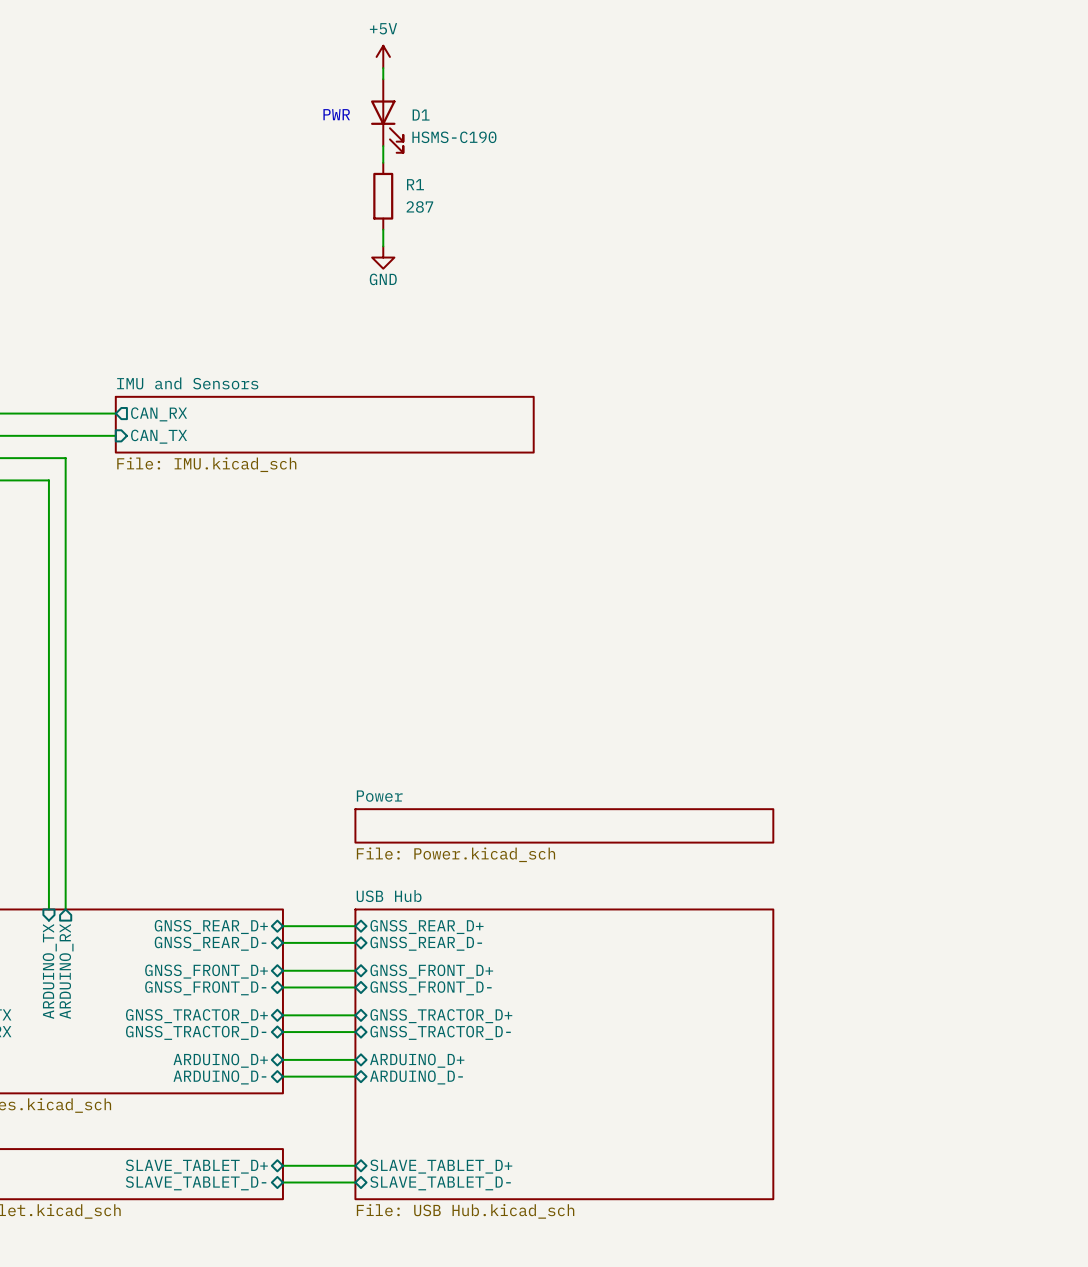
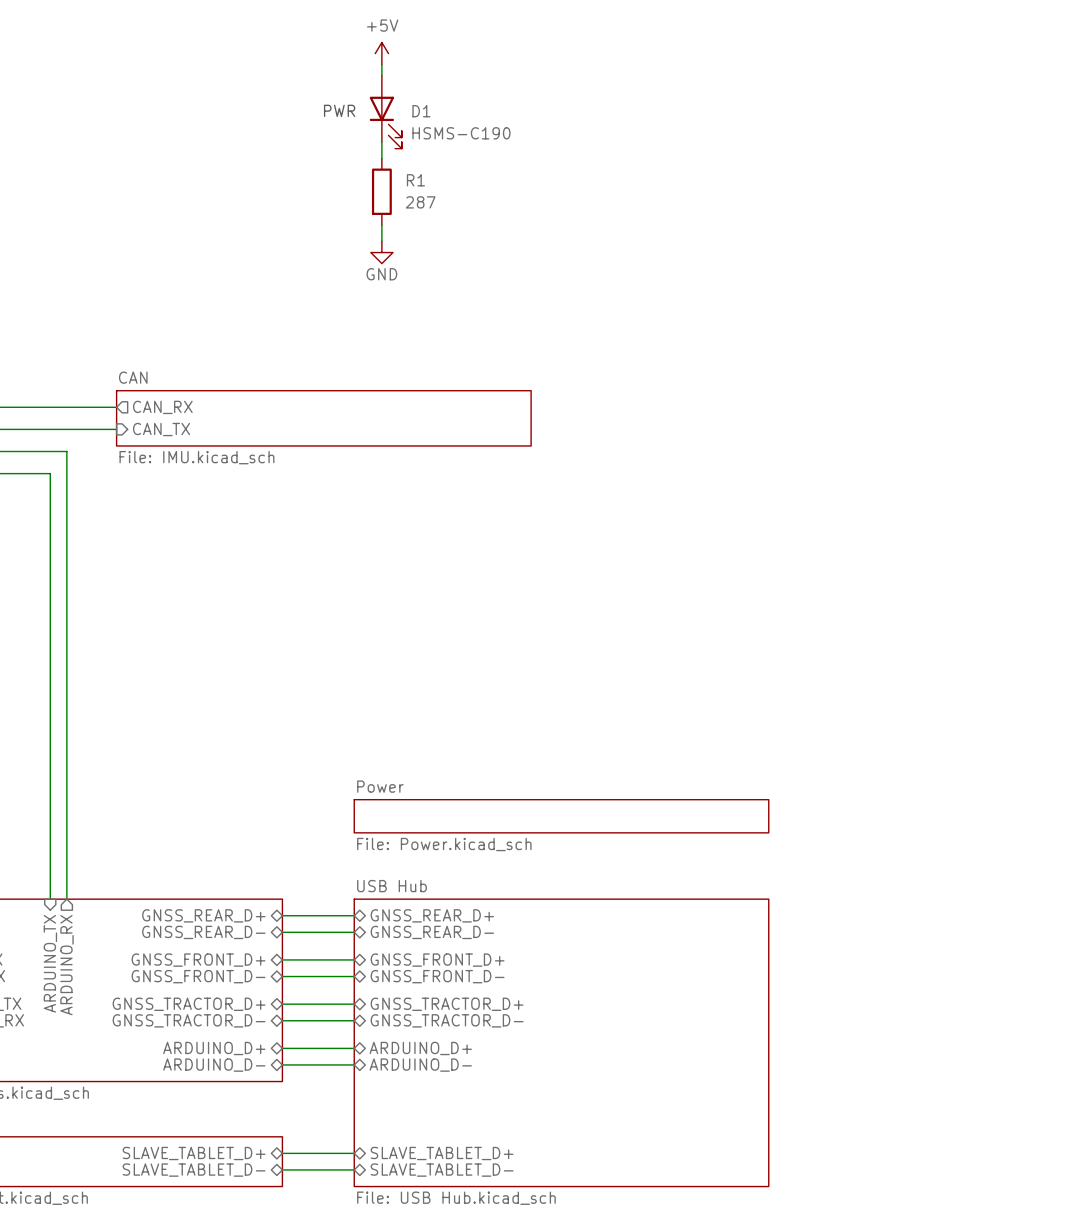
sheet IMU and Sensors name: IMU and Sensors (187, 383) -> CAN (133, 377)

